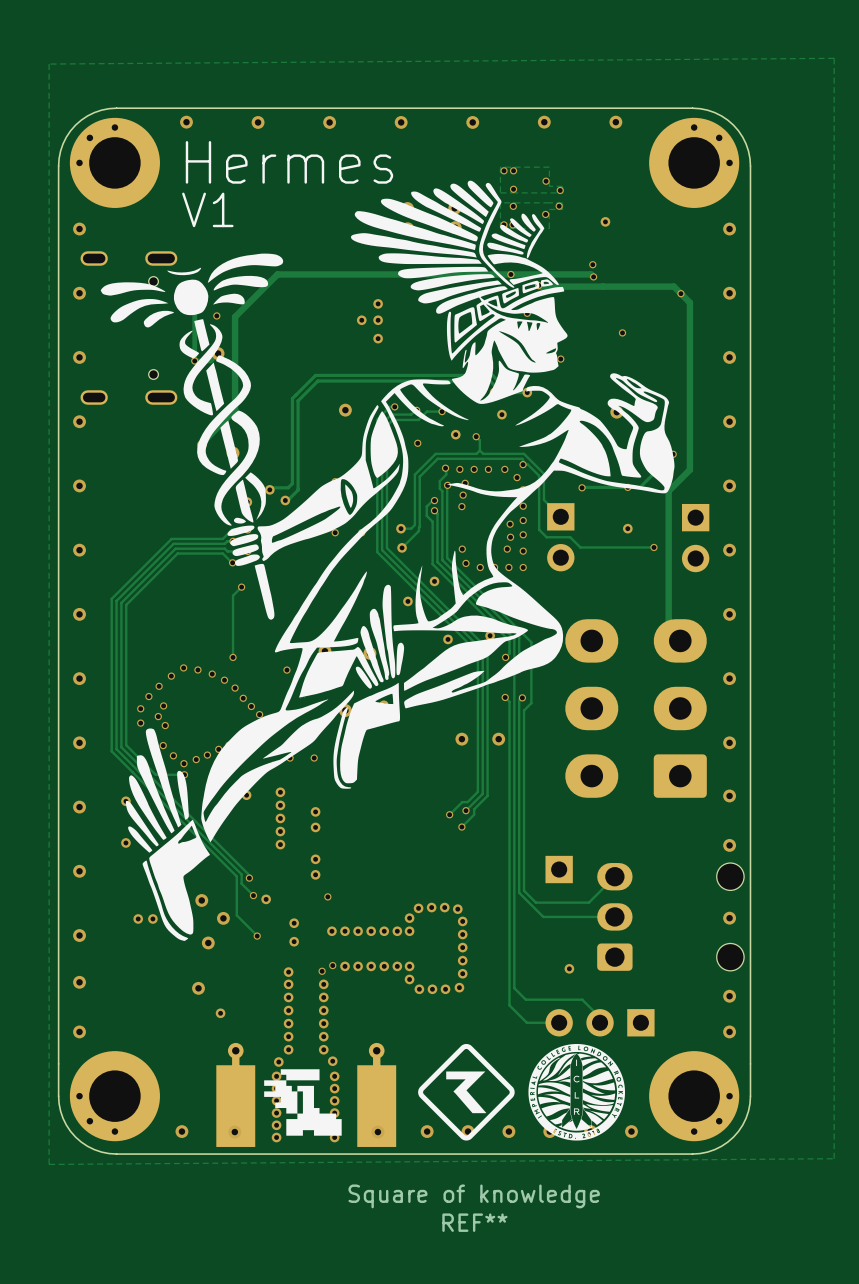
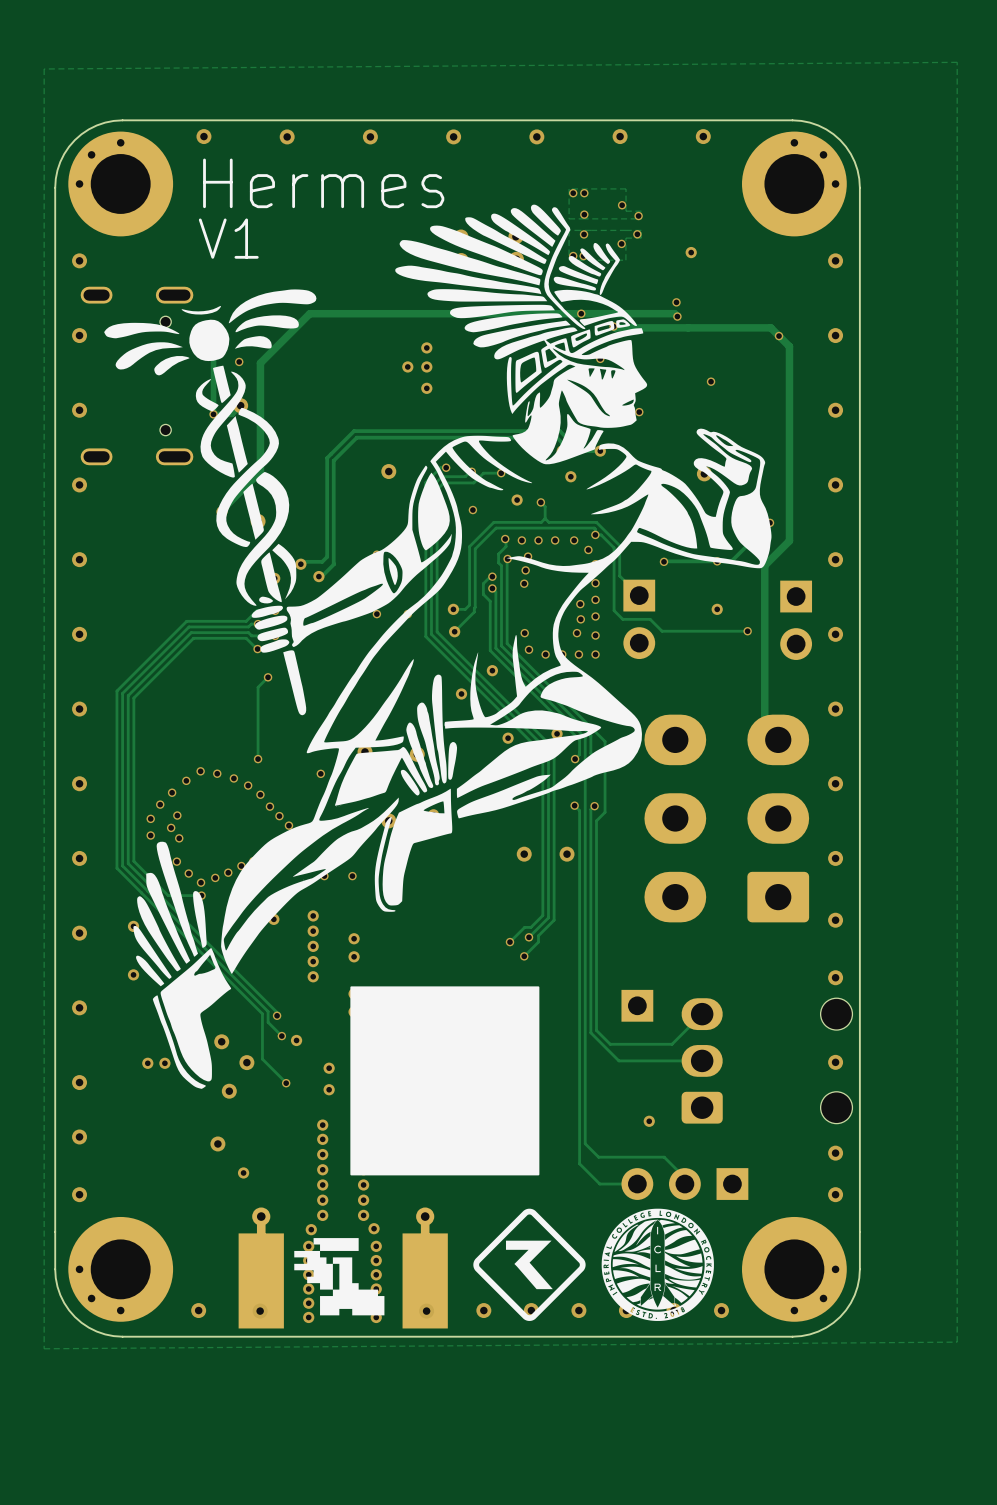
drawing: none -> [350, 986, 540, 1176]
REF**: Square of knowledge (474, 1208) -> none

